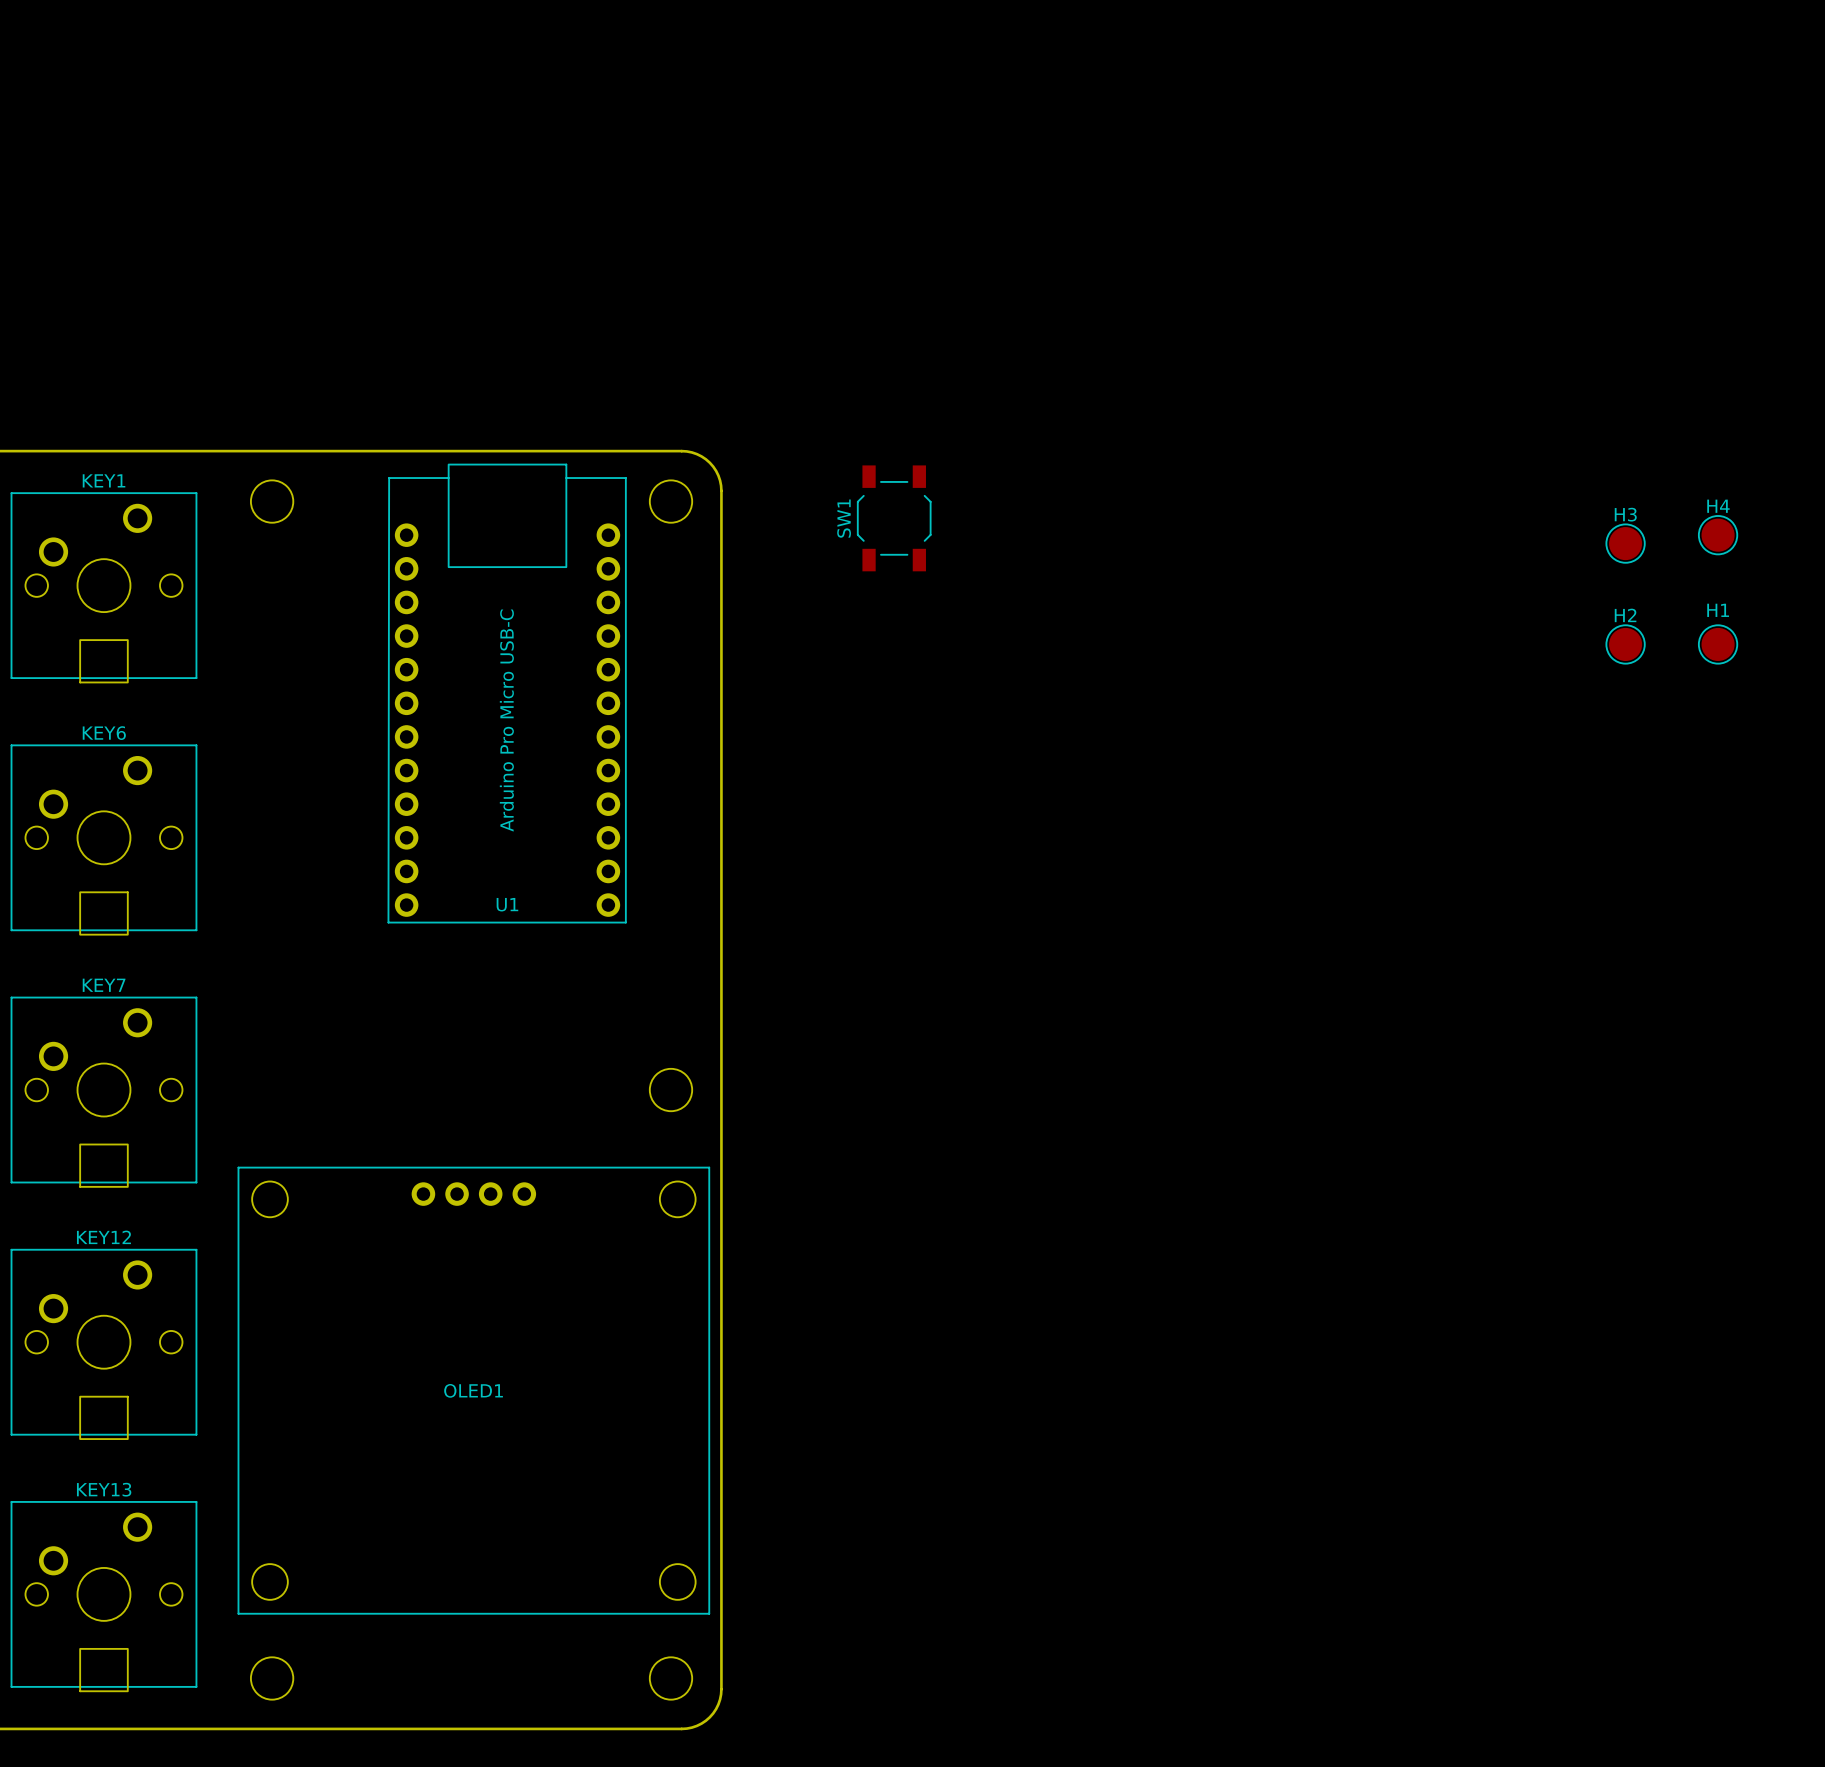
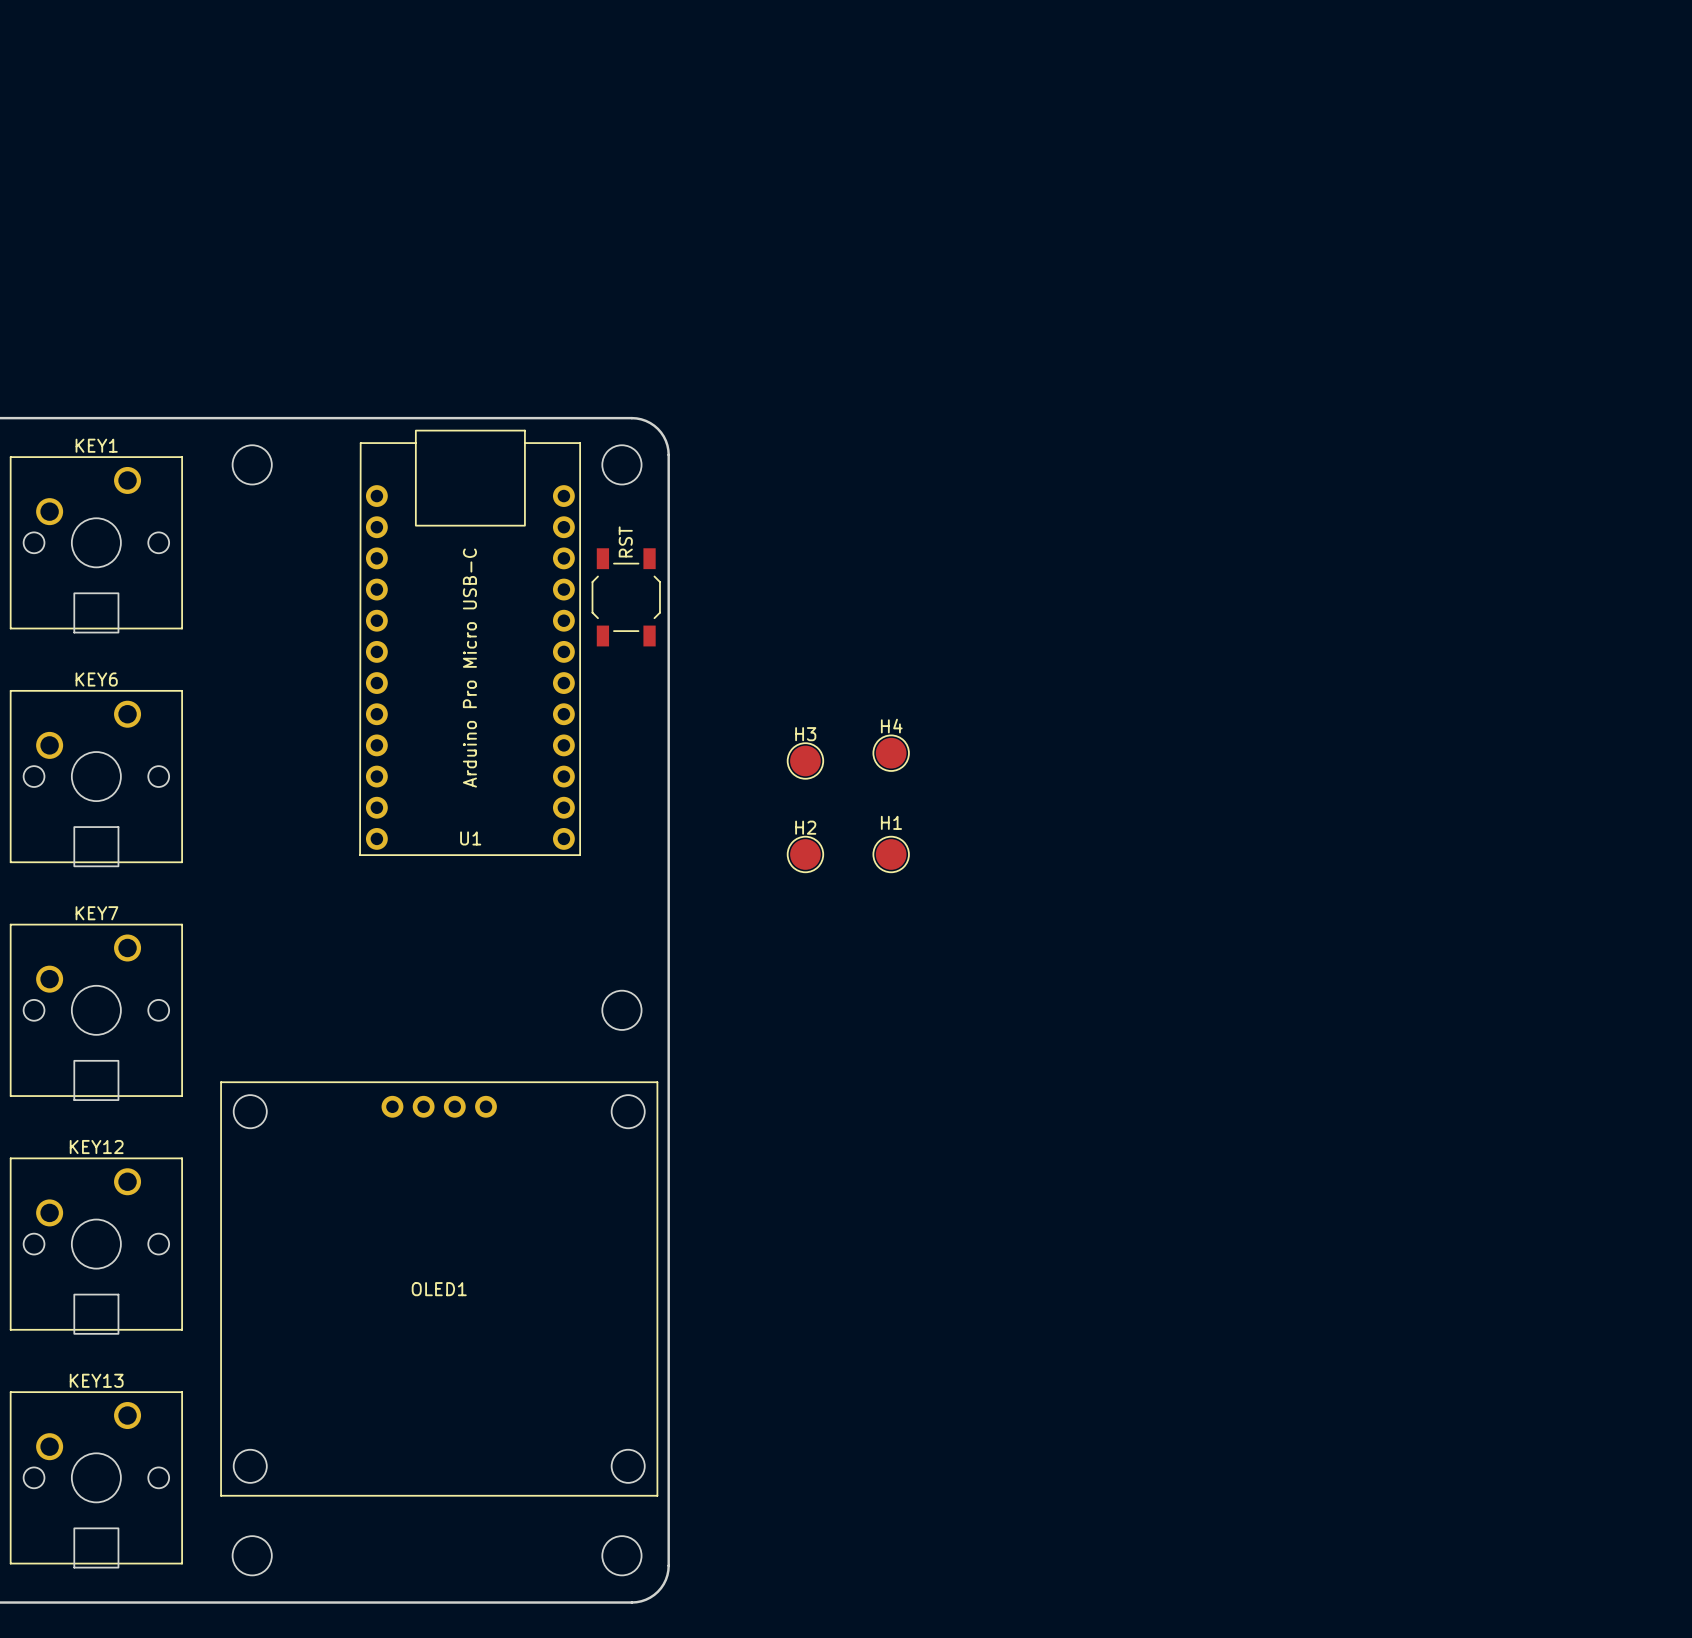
SW1: (894, 518) -> none
H4 position: (1718, 535) -> (891, 753)
H3 position: (1625, 543) -> (805, 760)
part: none -> (626, 597)
H2 position: (1625, 644) -> (805, 854)
H1 position: (1718, 644) -> (891, 854)

